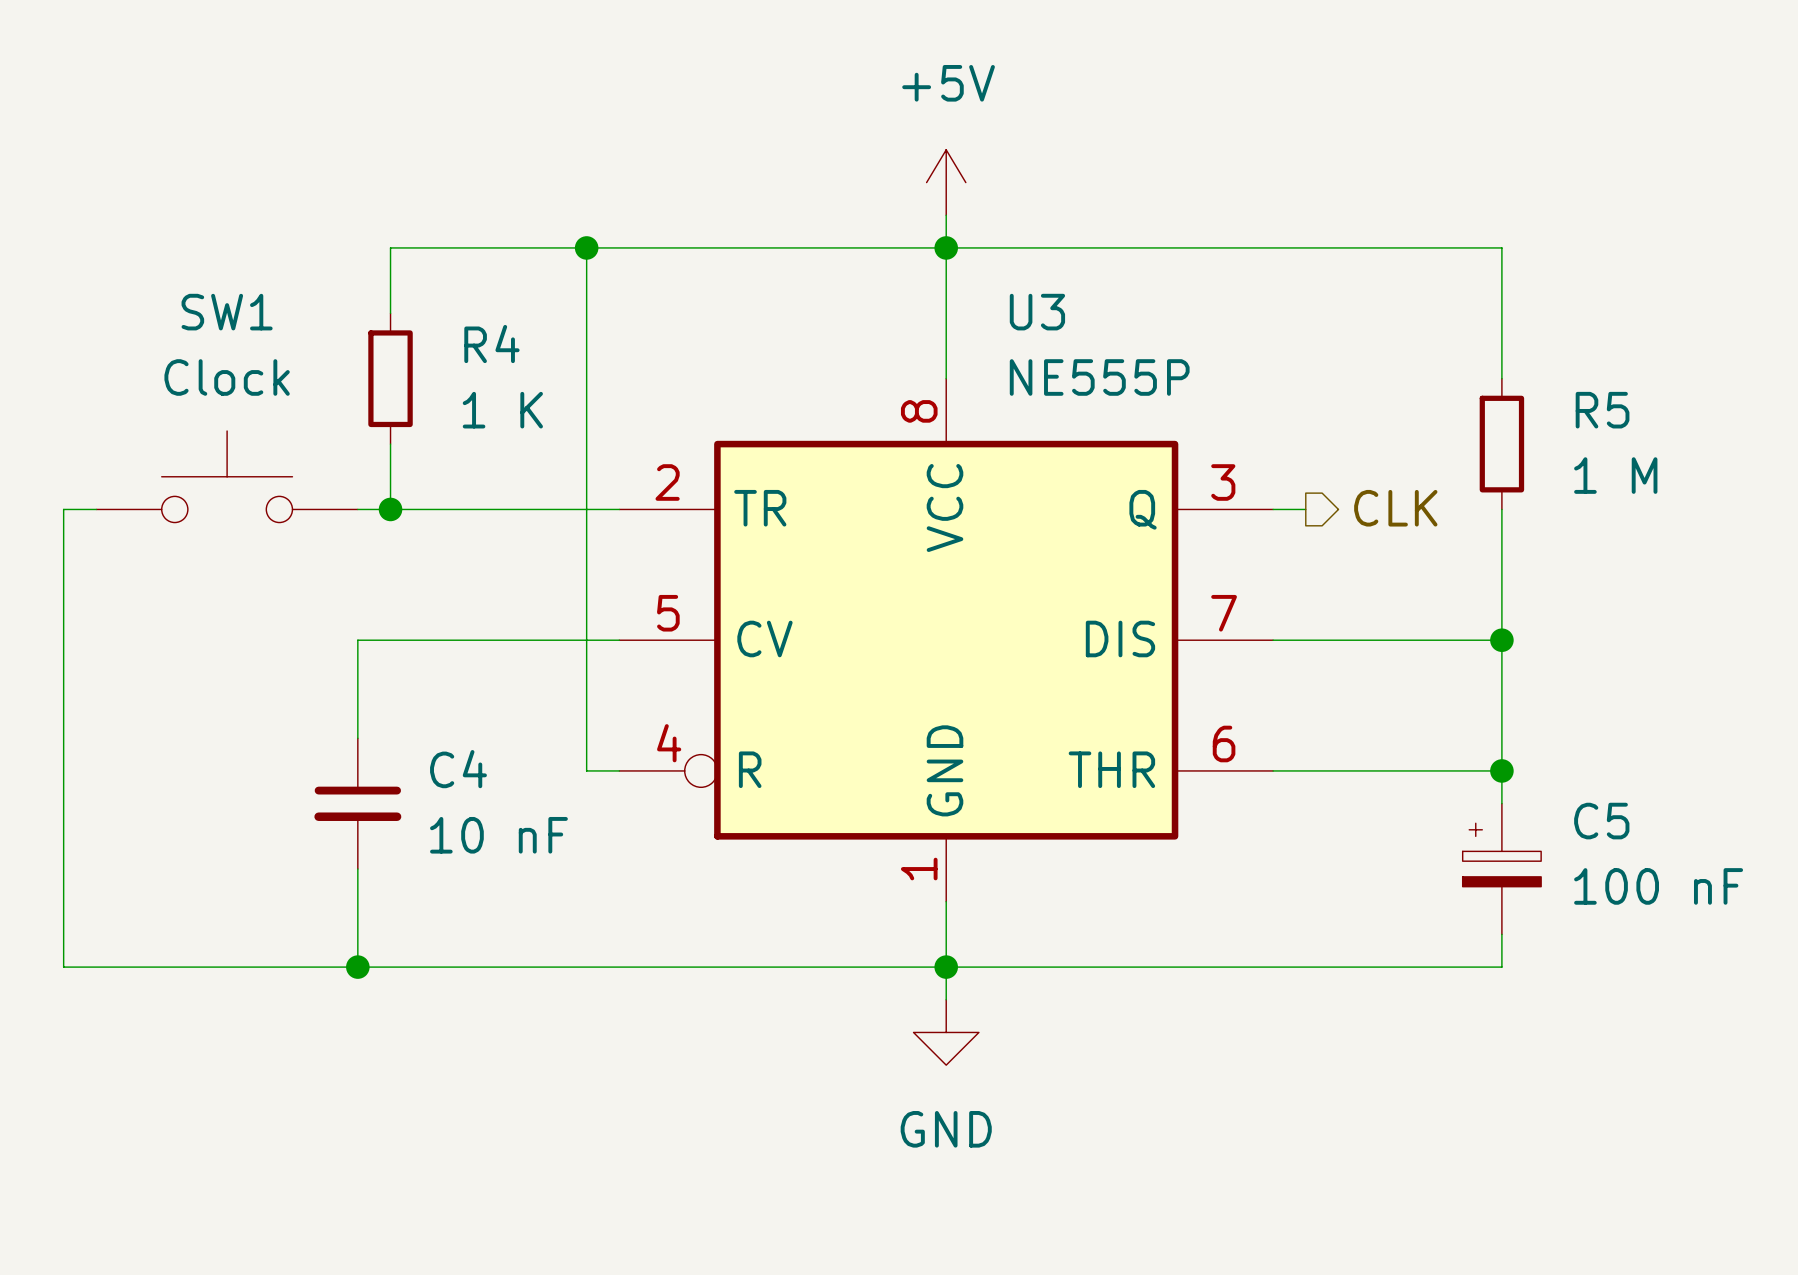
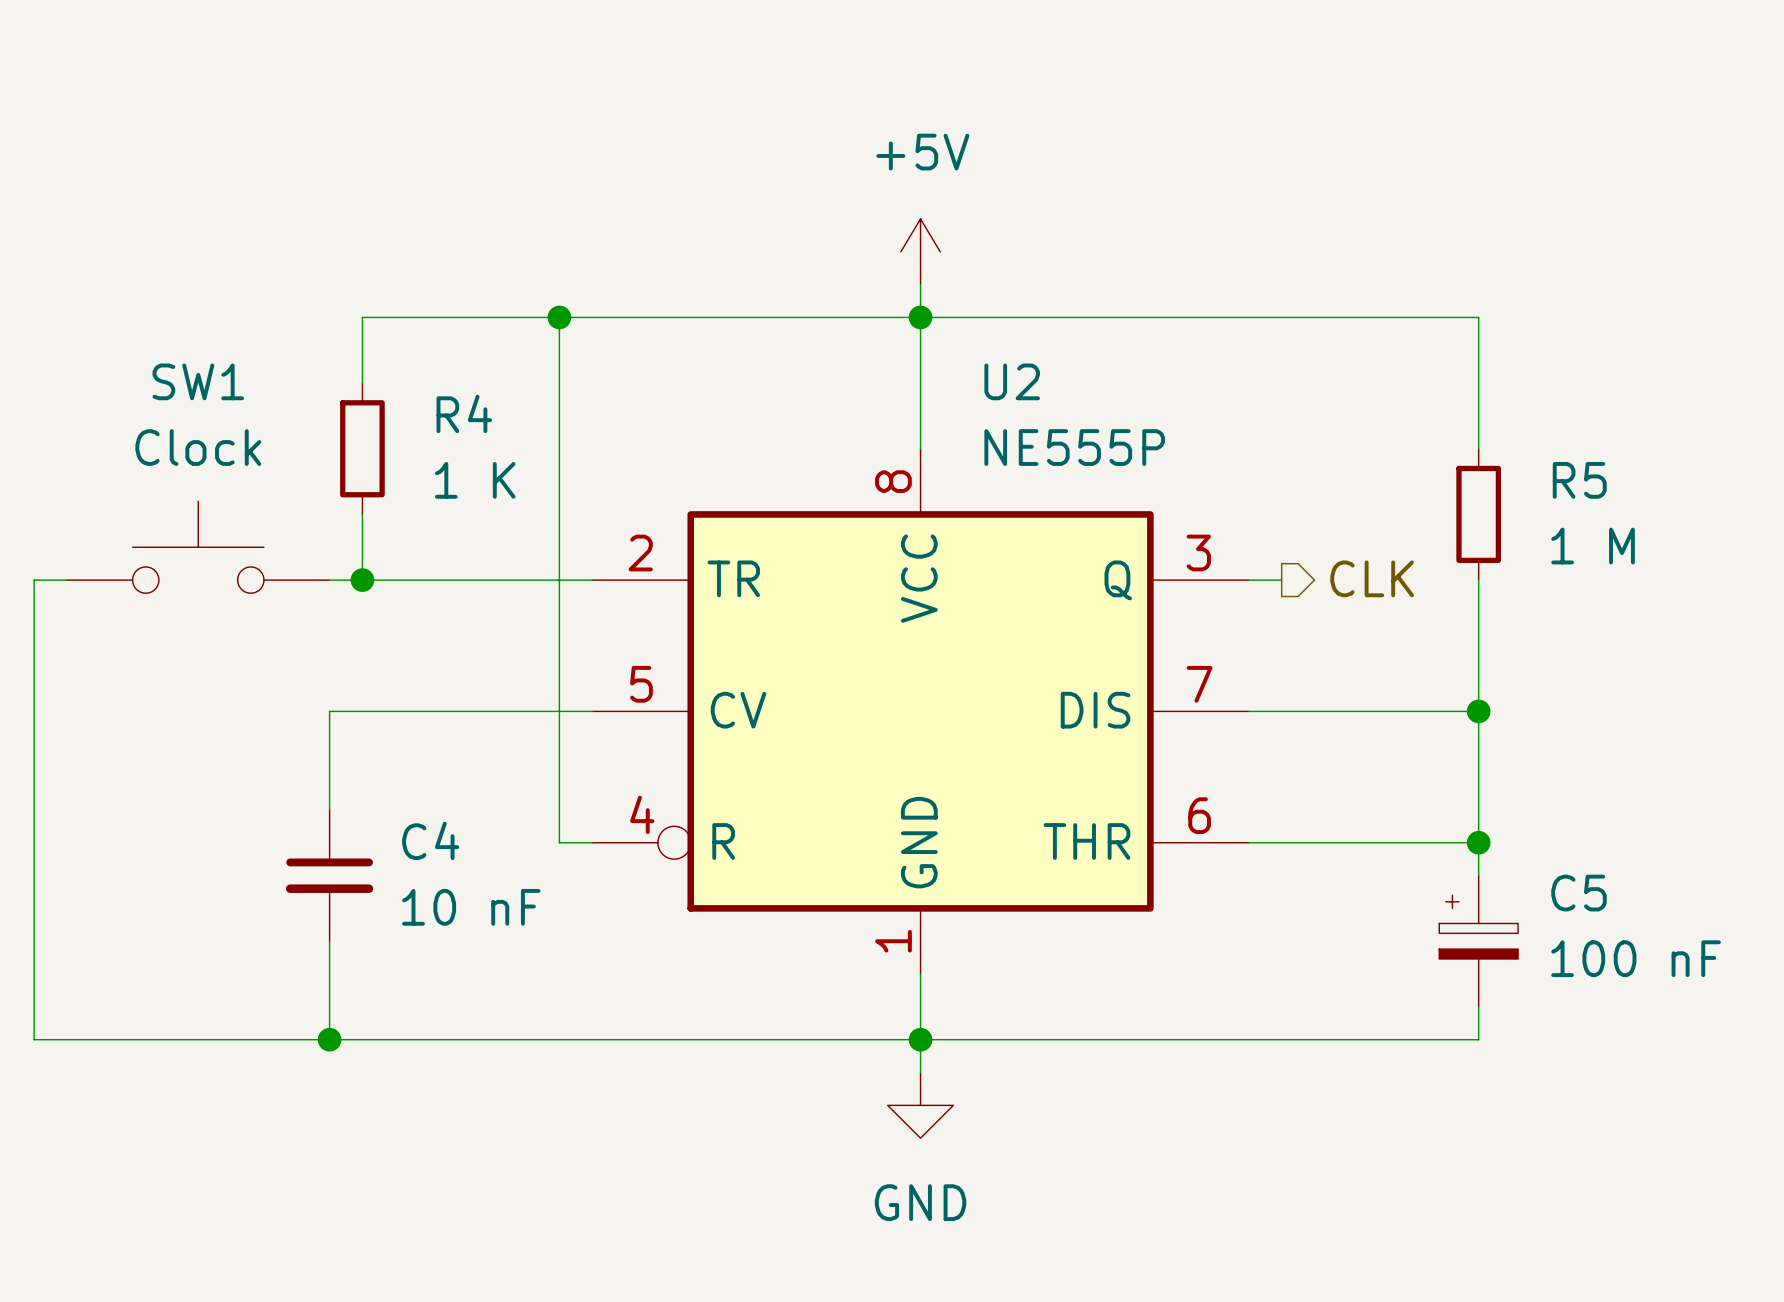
U3 name: U3 (1037, 312) -> U2 (1012, 381)

